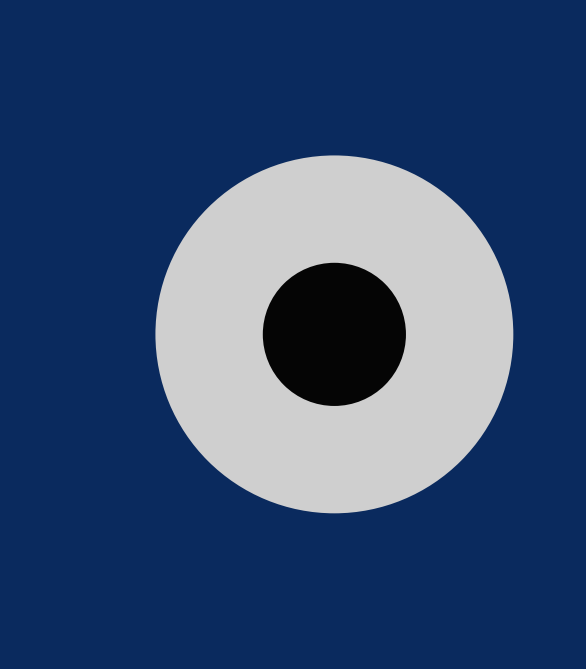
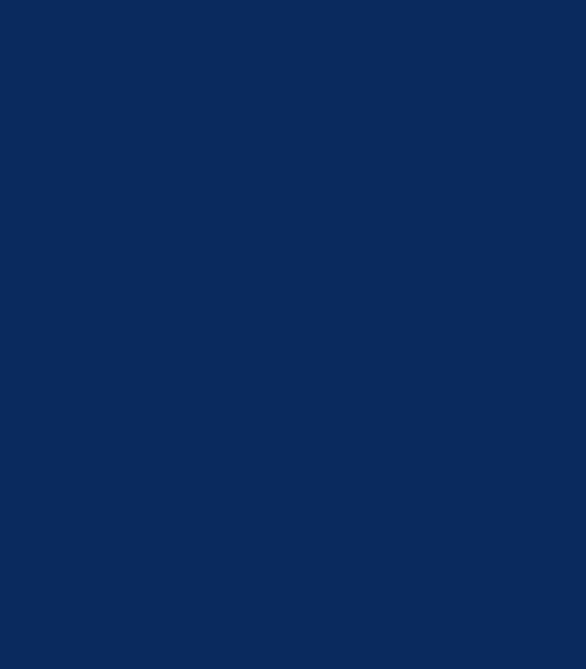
part: (334, 334) -> none

